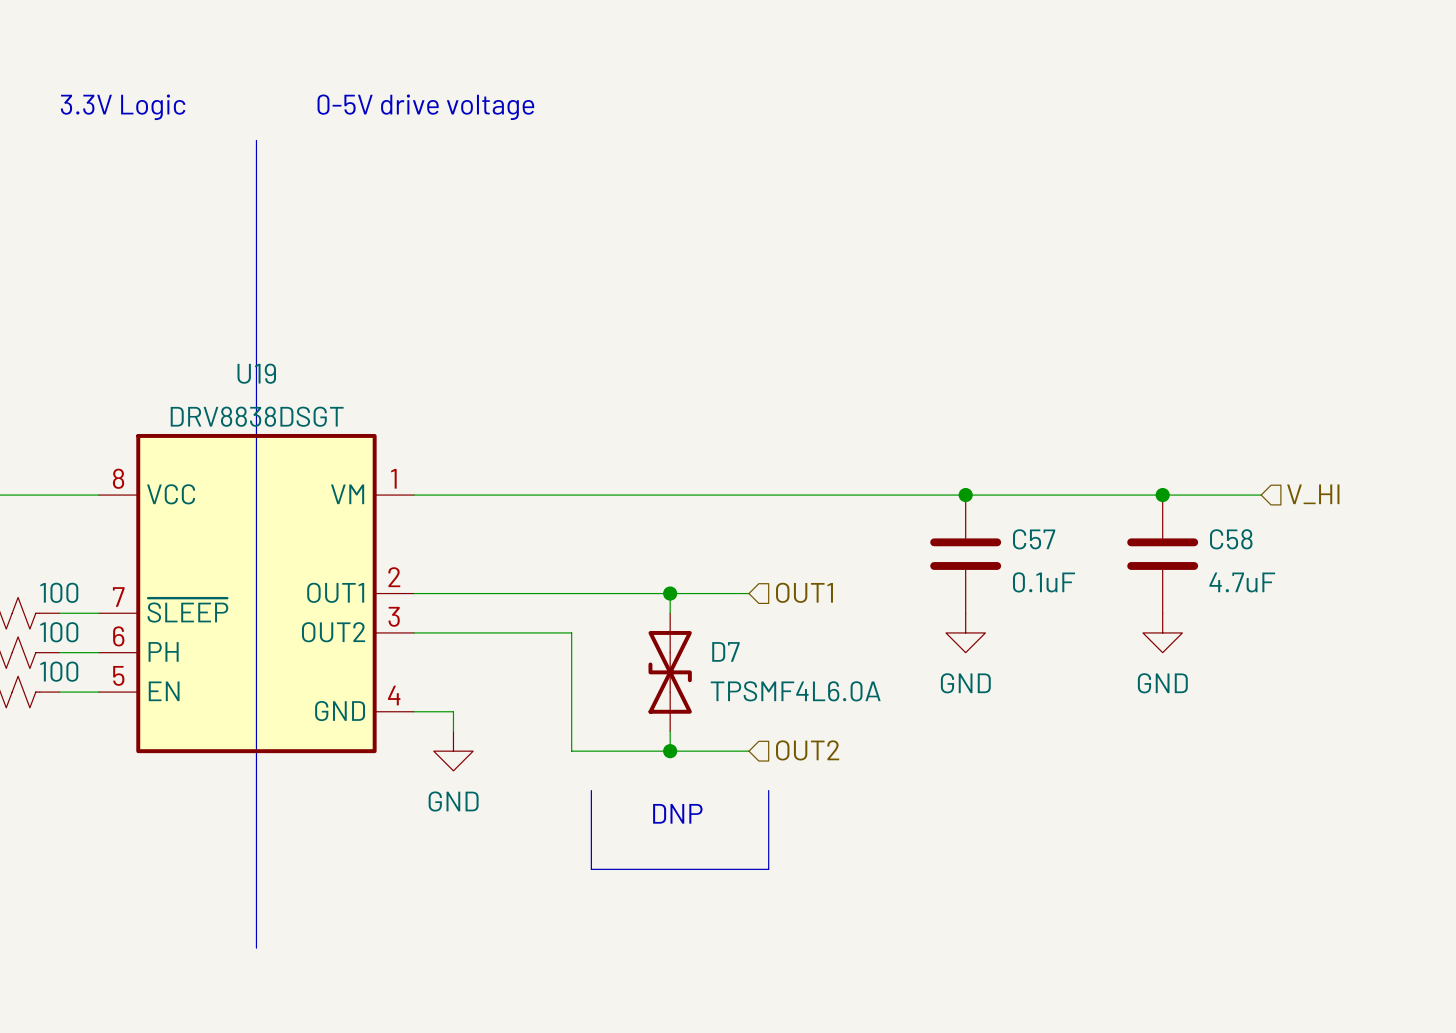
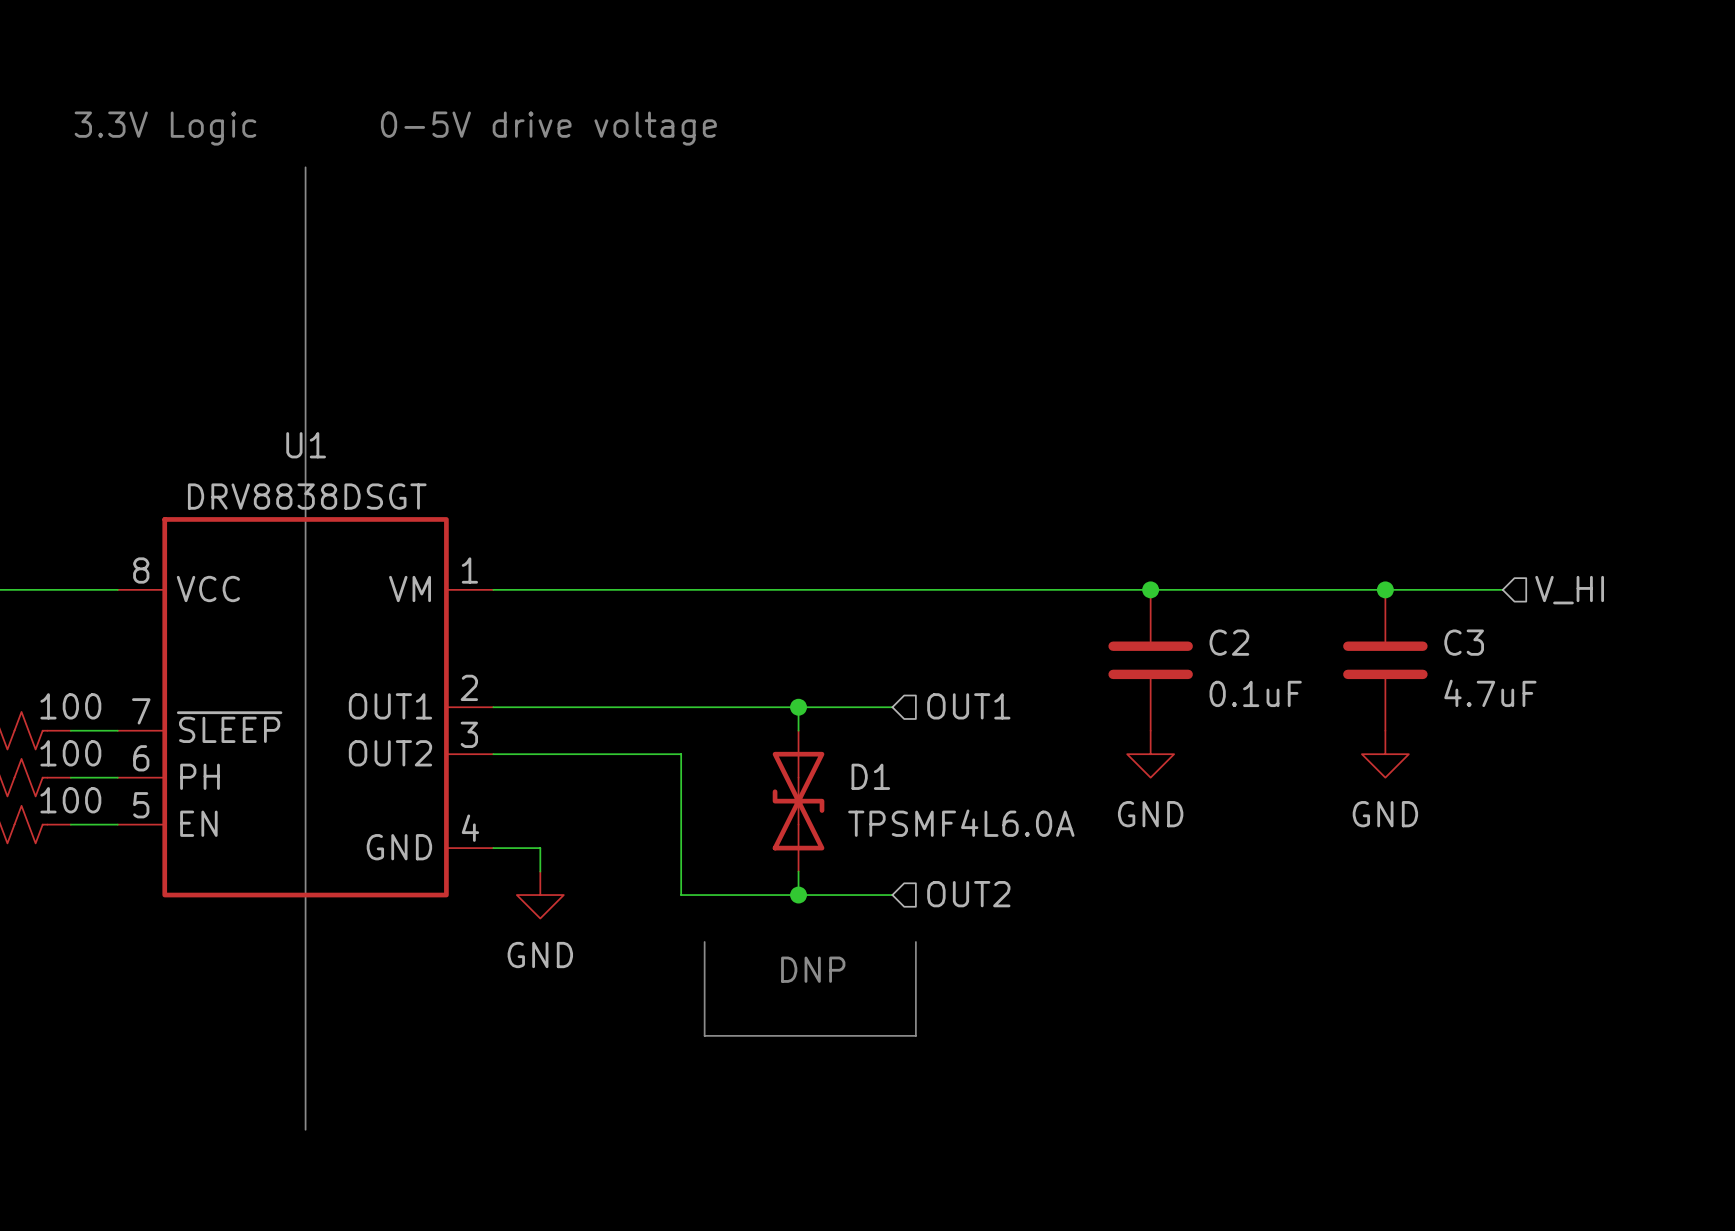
U19 name: U19 (256, 373) -> U1 (306, 445)
C57 name: C57 (1034, 539) -> C2 (1229, 642)
C58 name: C58 (1231, 539) -> C3 (1464, 642)
D7 name: D7 (725, 651) -> D1 (870, 776)

